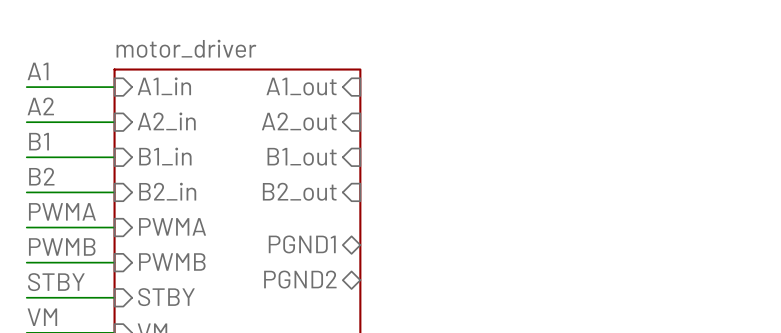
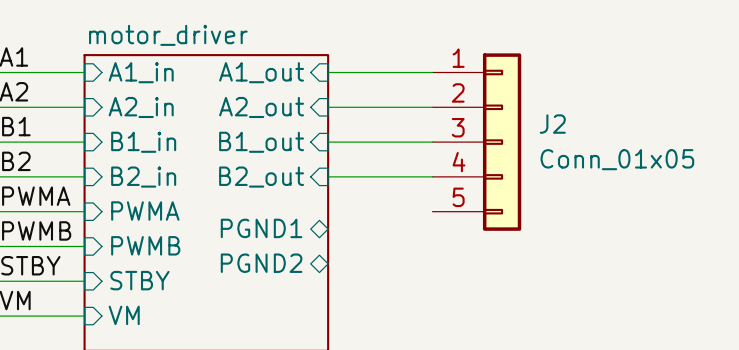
wire: none -> (328, 72) (432, 72)
wire: none -> (328, 107) (432, 107)
wire: none -> (328, 142) (432, 142)
J2: none -> Conn_01x05 (476, 142)
wire: none -> (328, 176) (432, 176)

